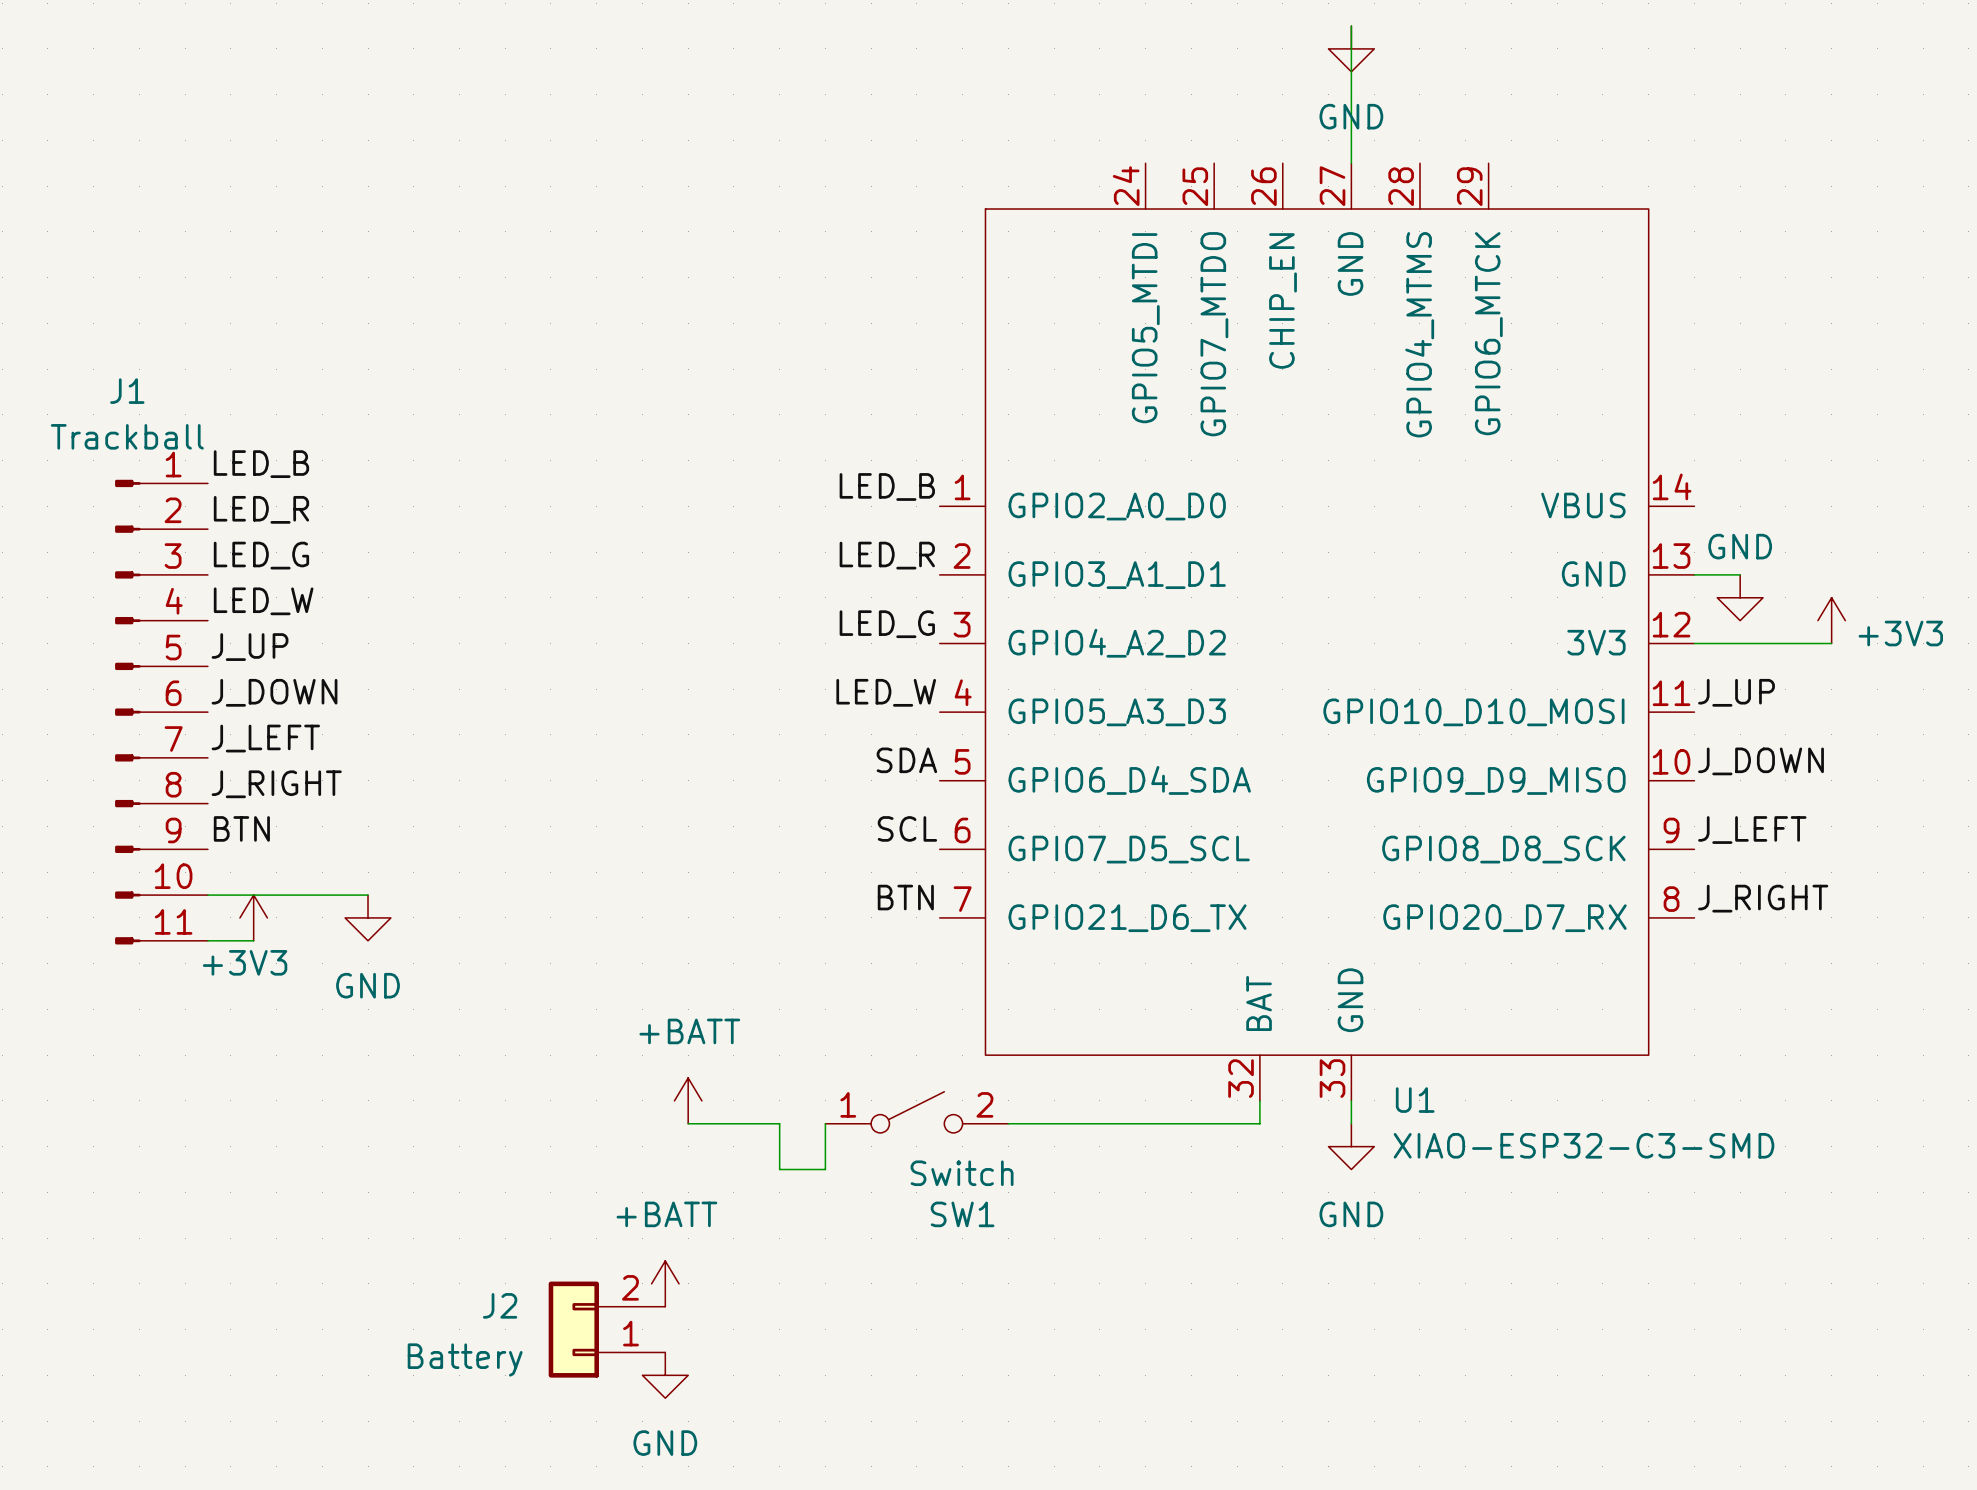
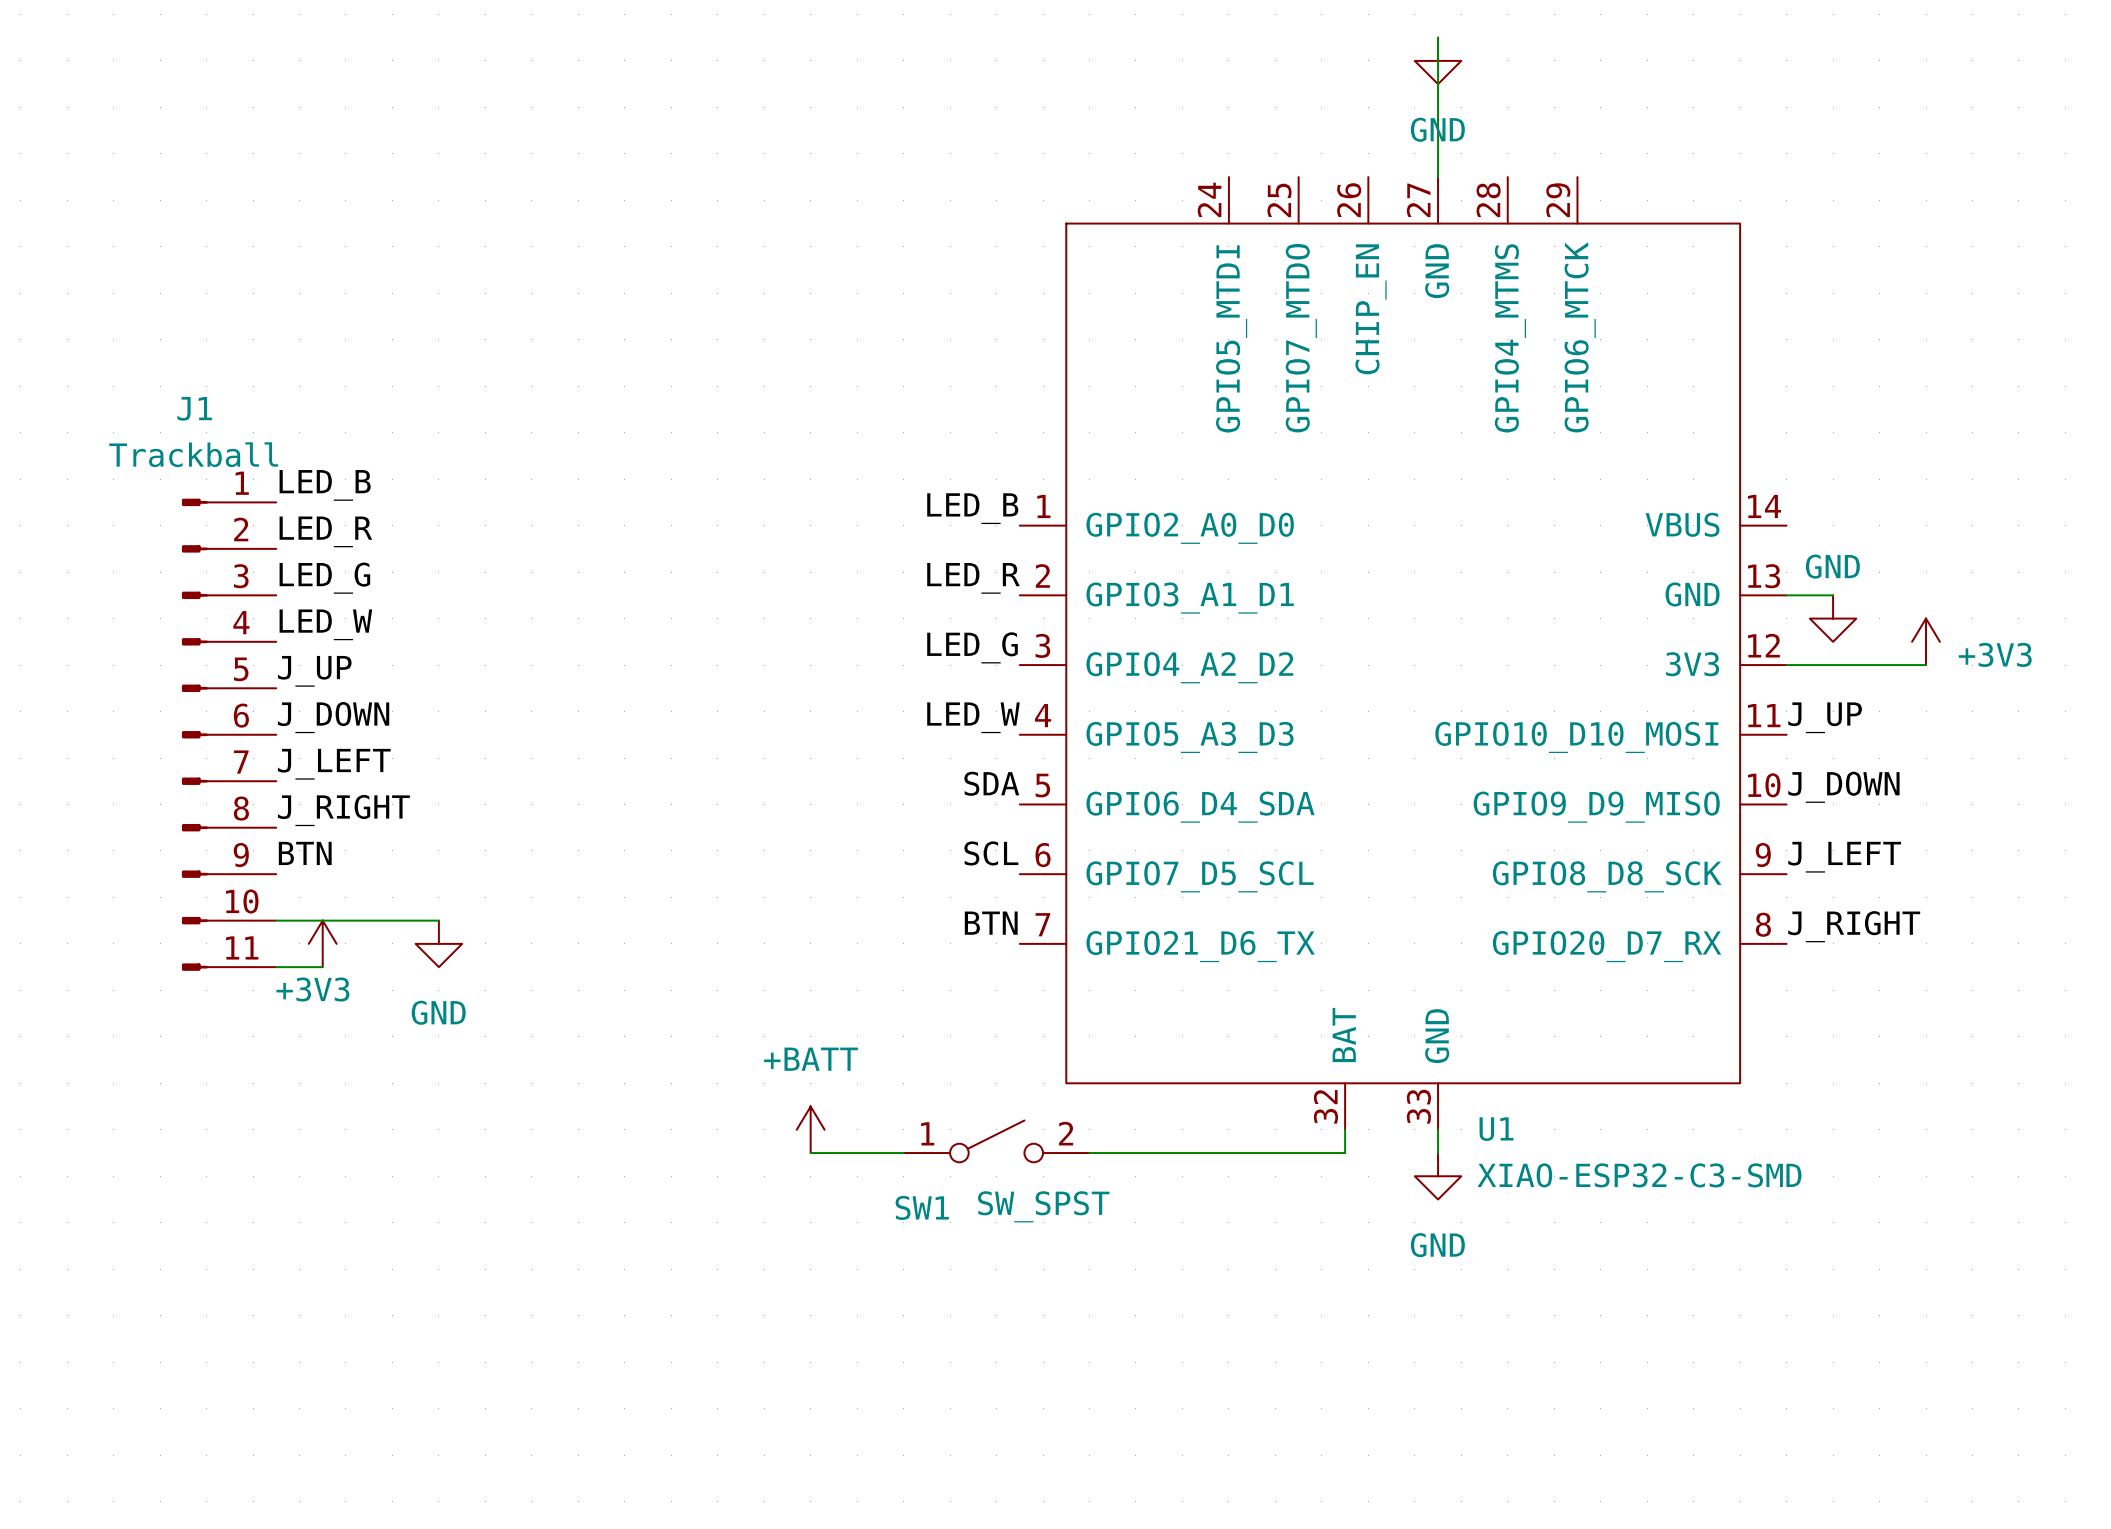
power symbol position: +BATT (688, 1100) -> +BATT (810, 1129)
wire: (688, 1123) (733, 1123) -> none
wire: (779, 1123) (779, 1169) (825, 1169) (825, 1123) -> (857, 1153) (903, 1153)
SW1 value: Switch (962, 1173) -> SW_SPST (1043, 1206)
SW1 name position: SW1 (962, 1214) -> SW1 (922, 1207)
power symbol: +BATT (665, 1283) -> none
J2: Battery (606, 1329) -> none
power symbol: GND (665, 1375) -> none

